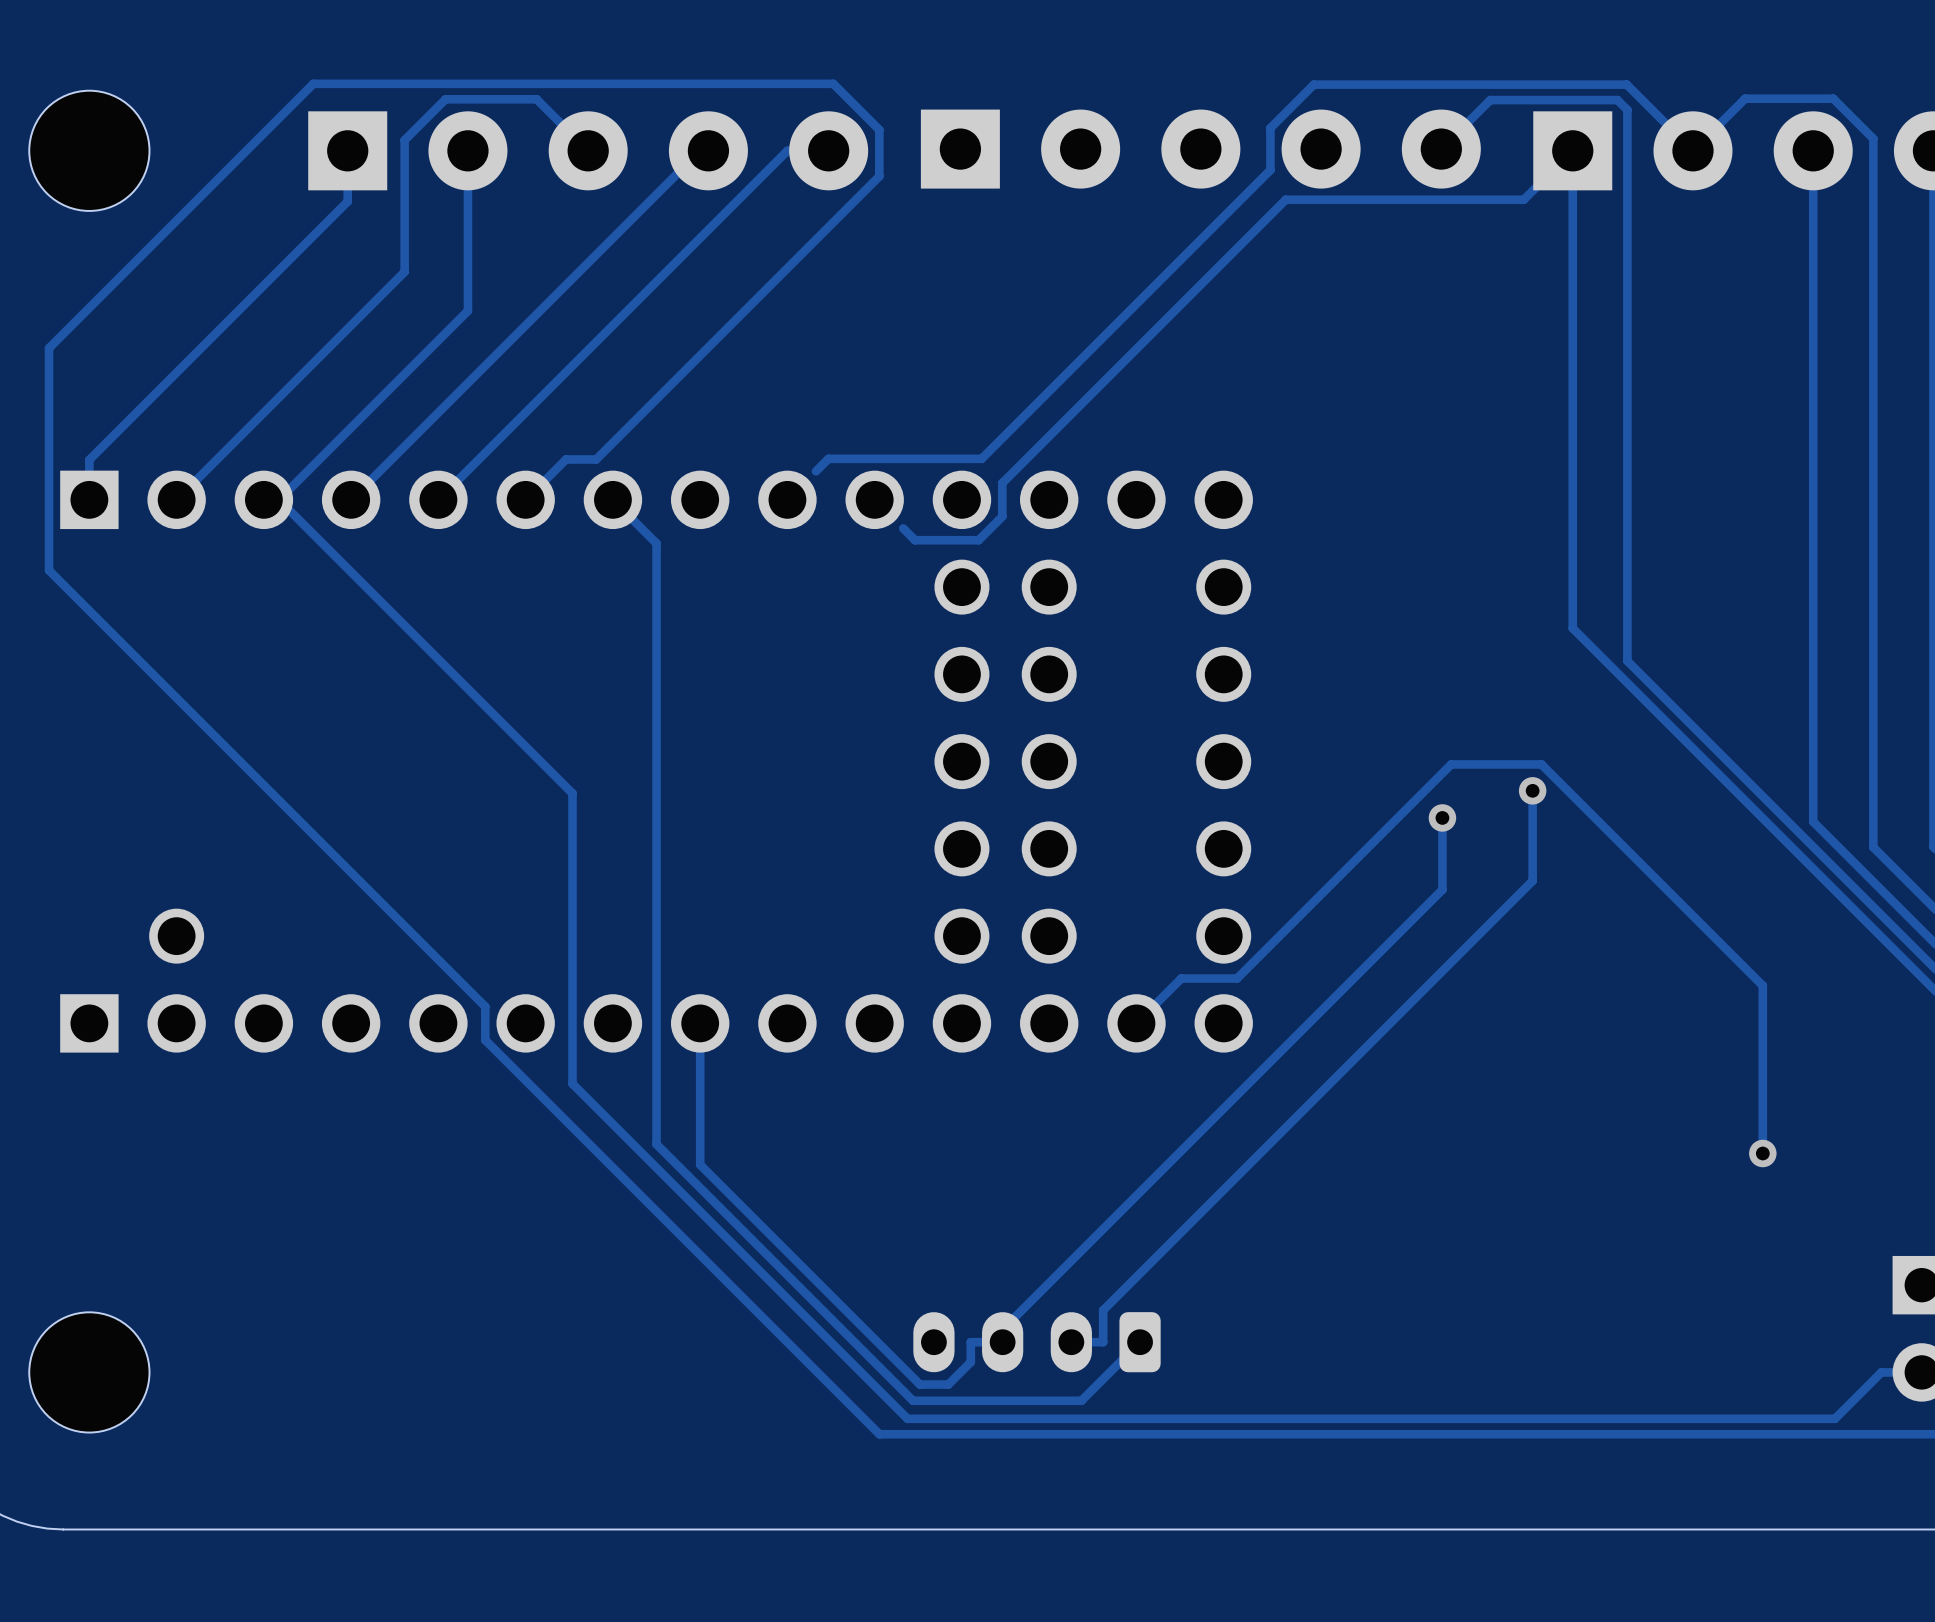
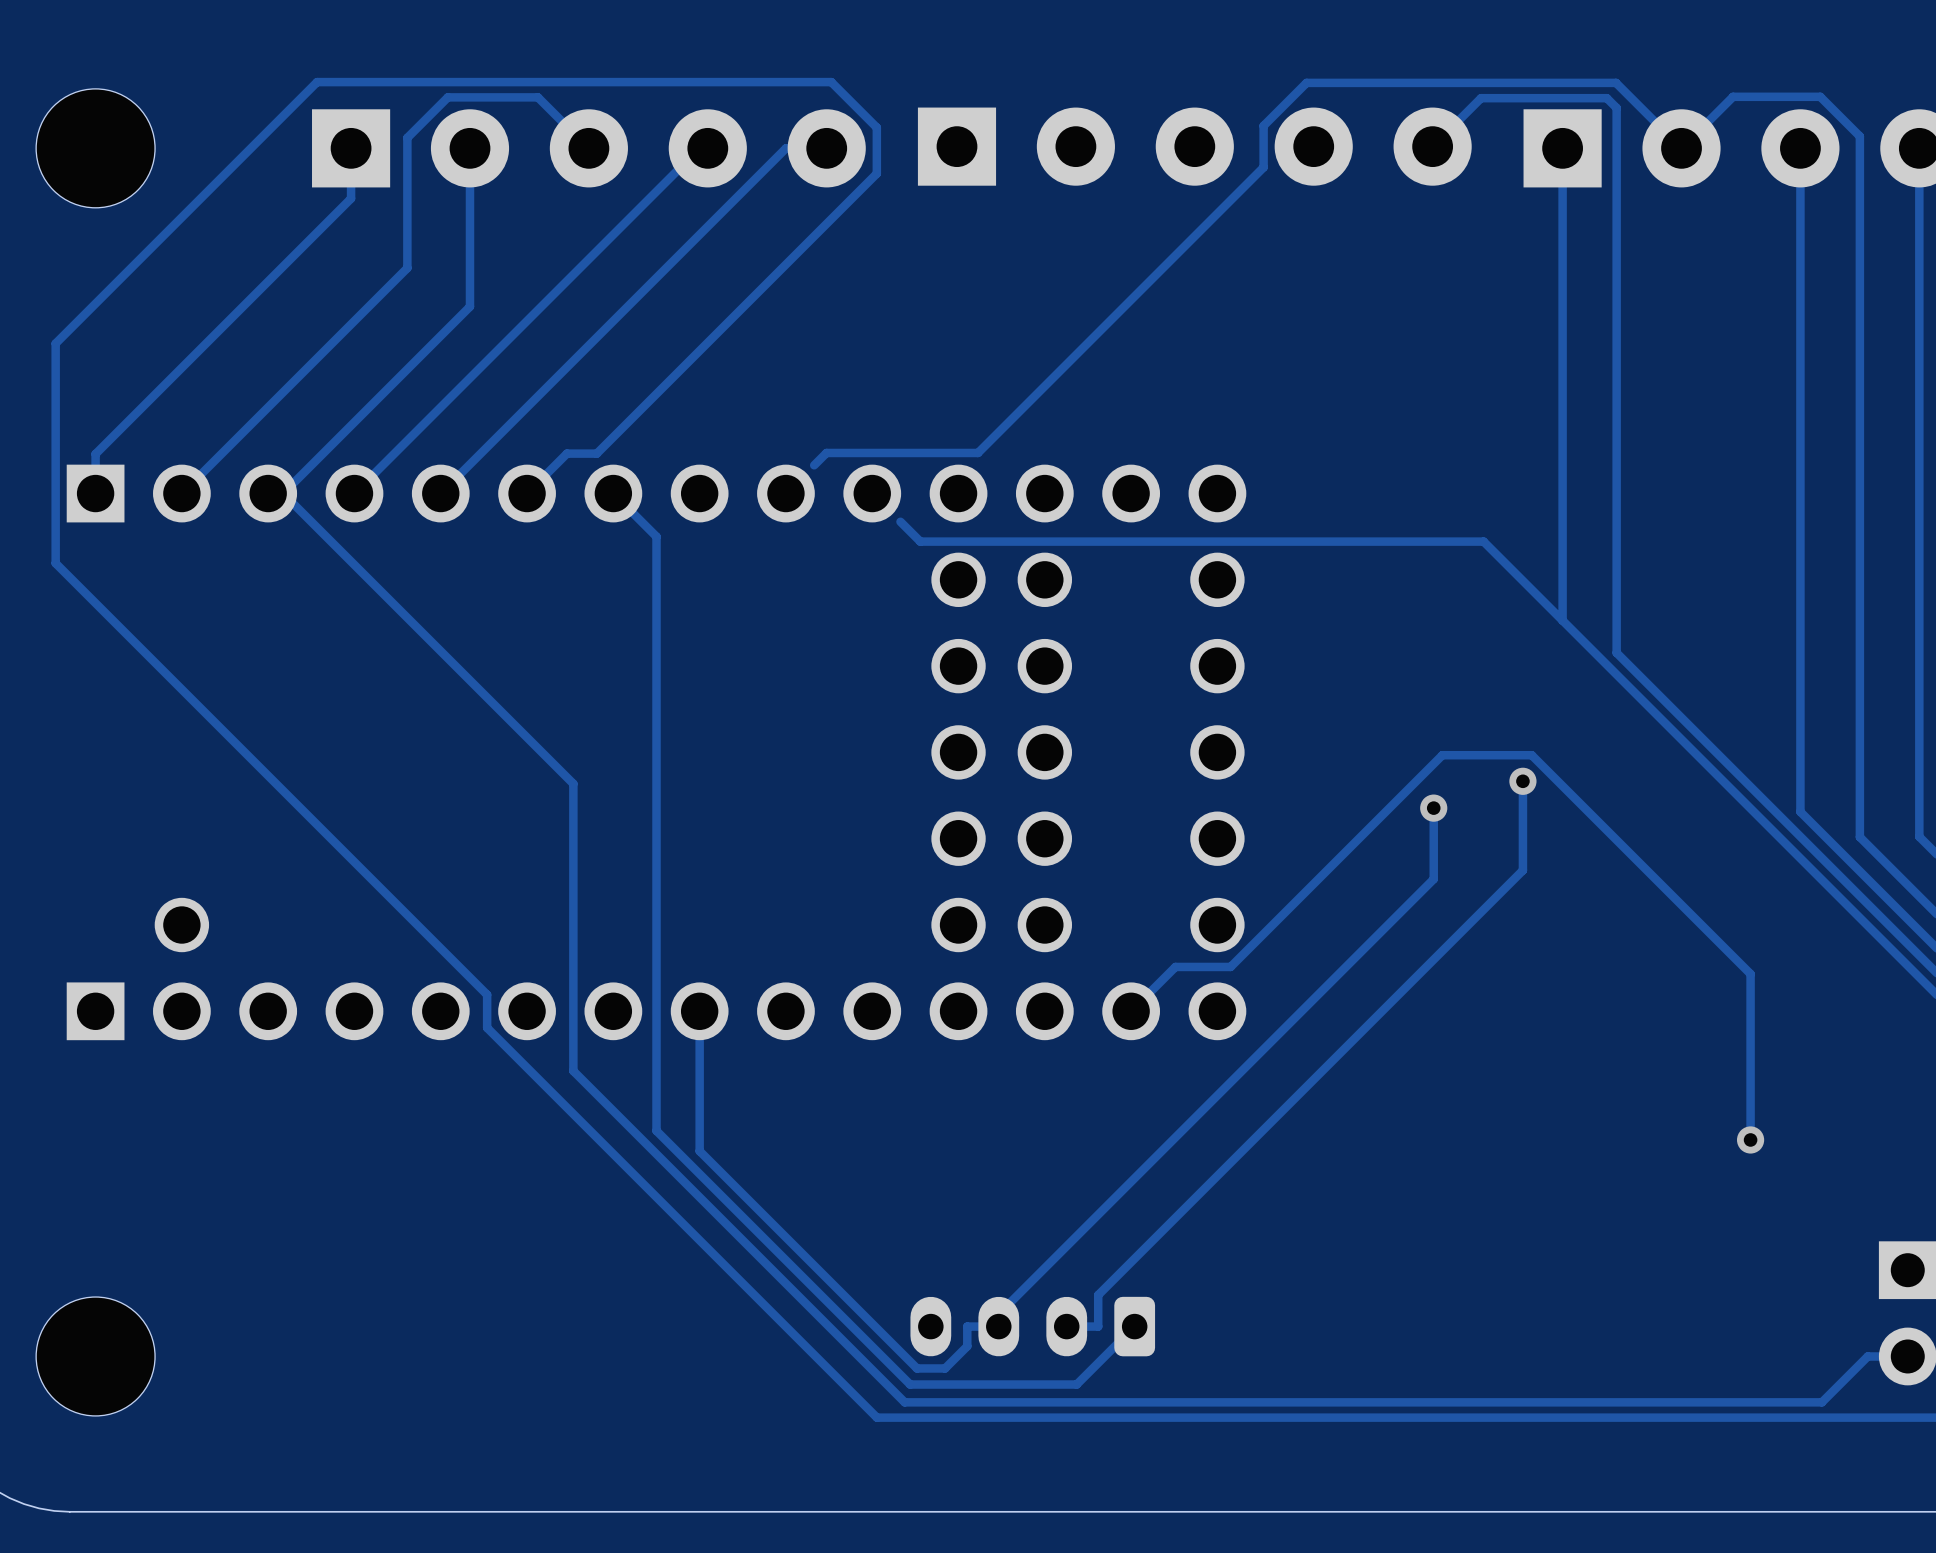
track: (1572, 150) (1523, 199) (1285, 199) (1002, 483) (1002, 516) (978, 540) (915, 540) -> (1562, 620) (1483, 541) (920, 541) (912, 533)

